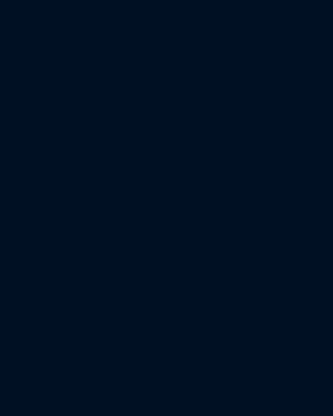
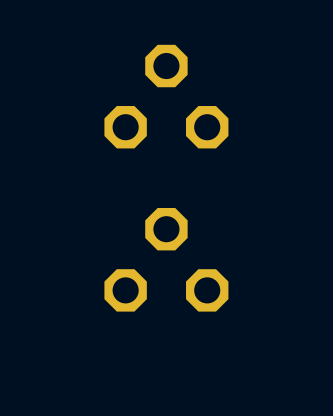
part: none -> (166, 96)
part: none -> (166, 259)

